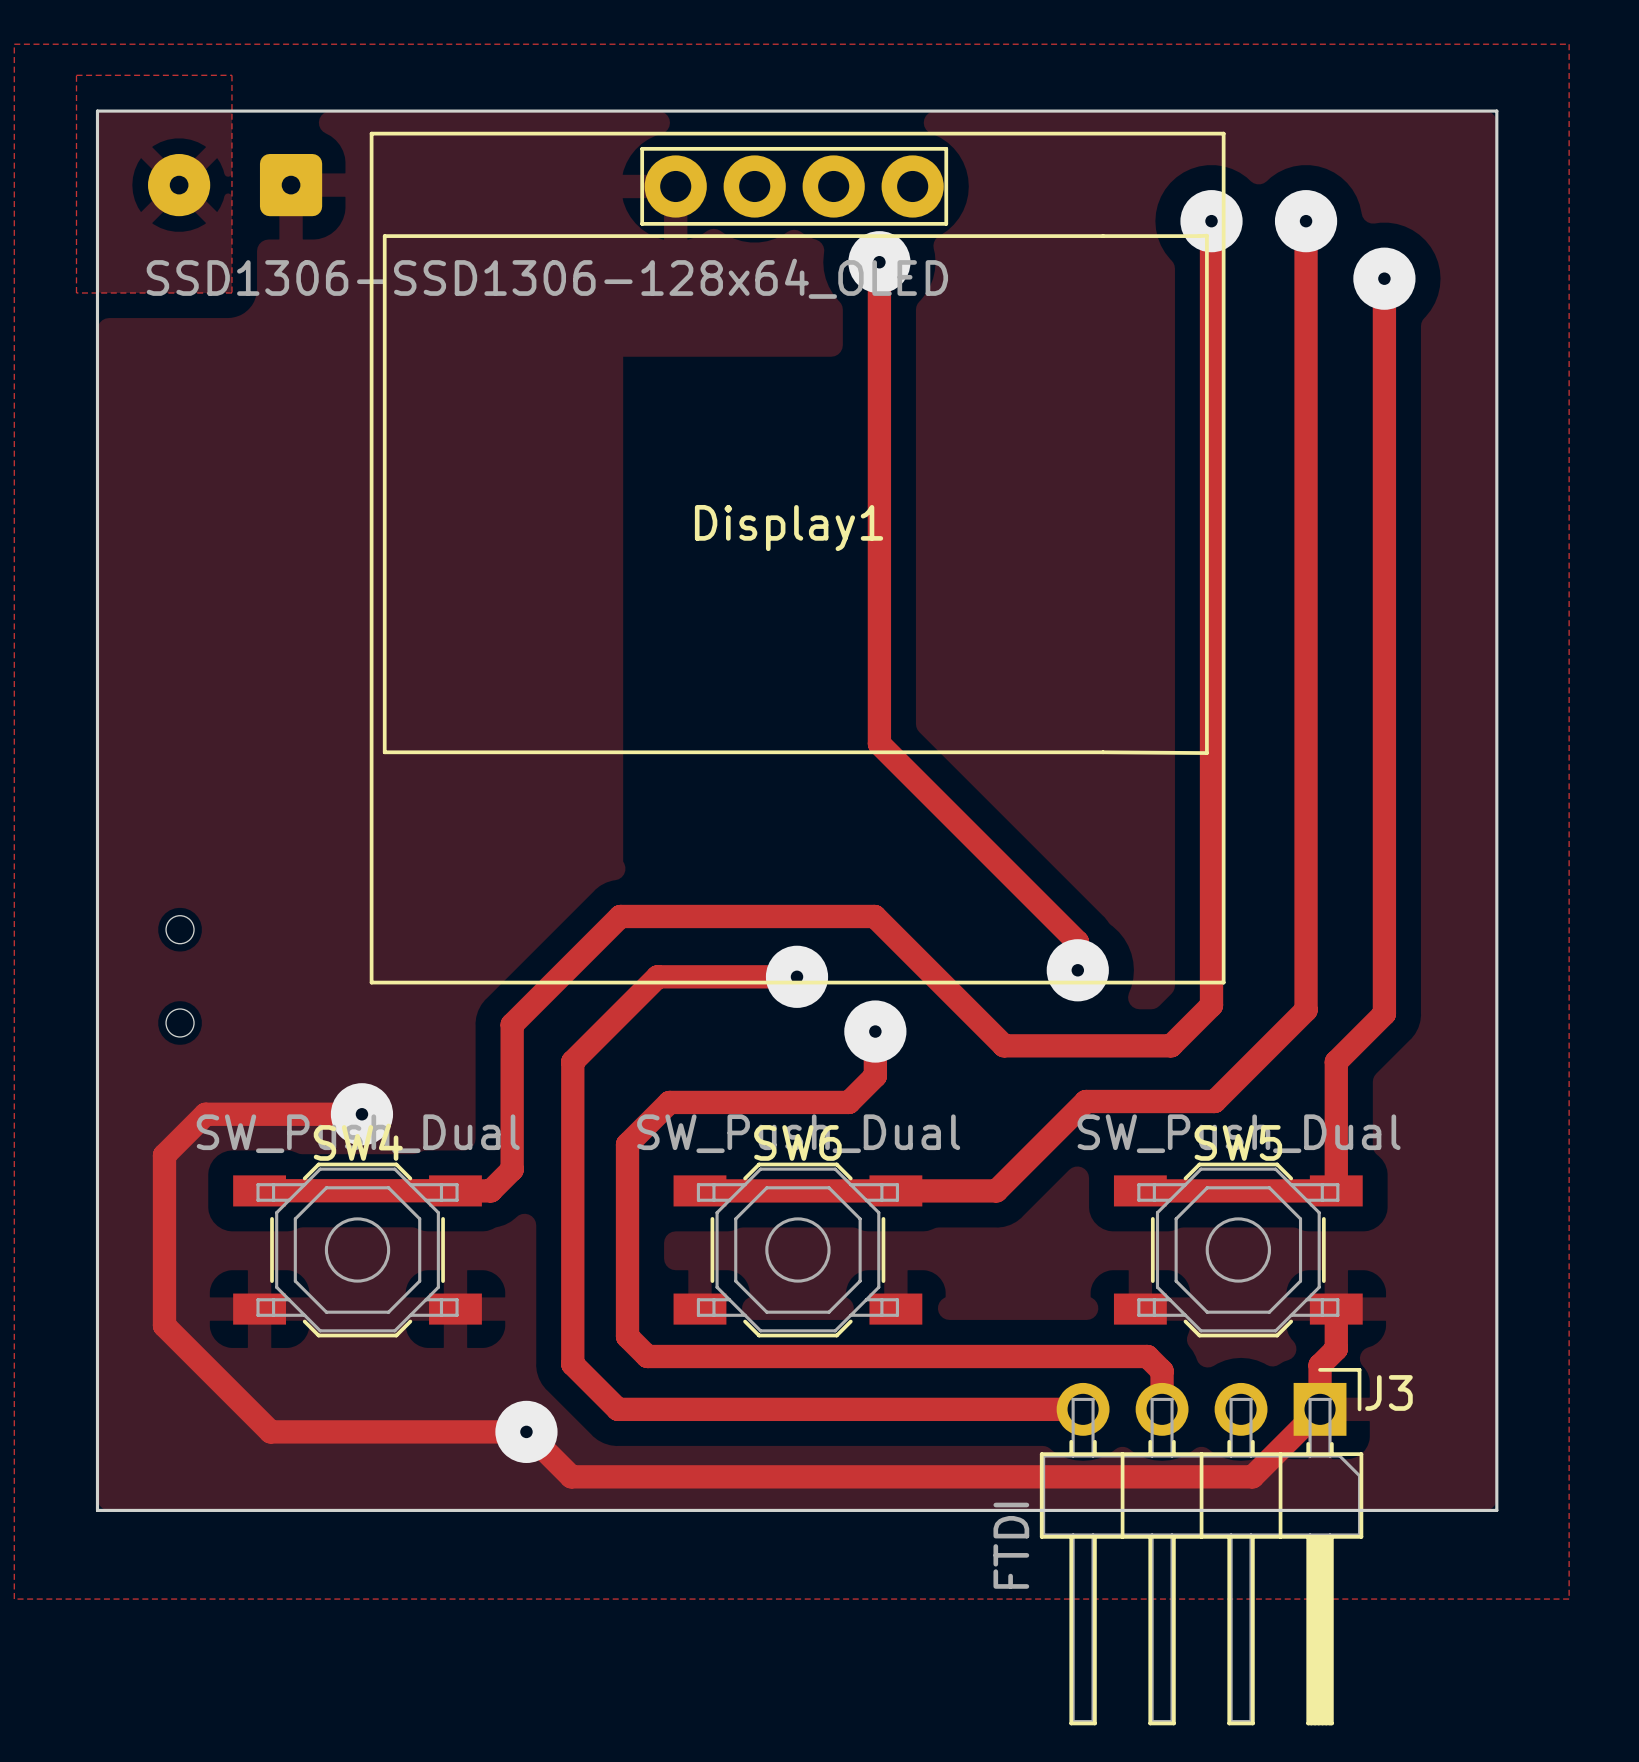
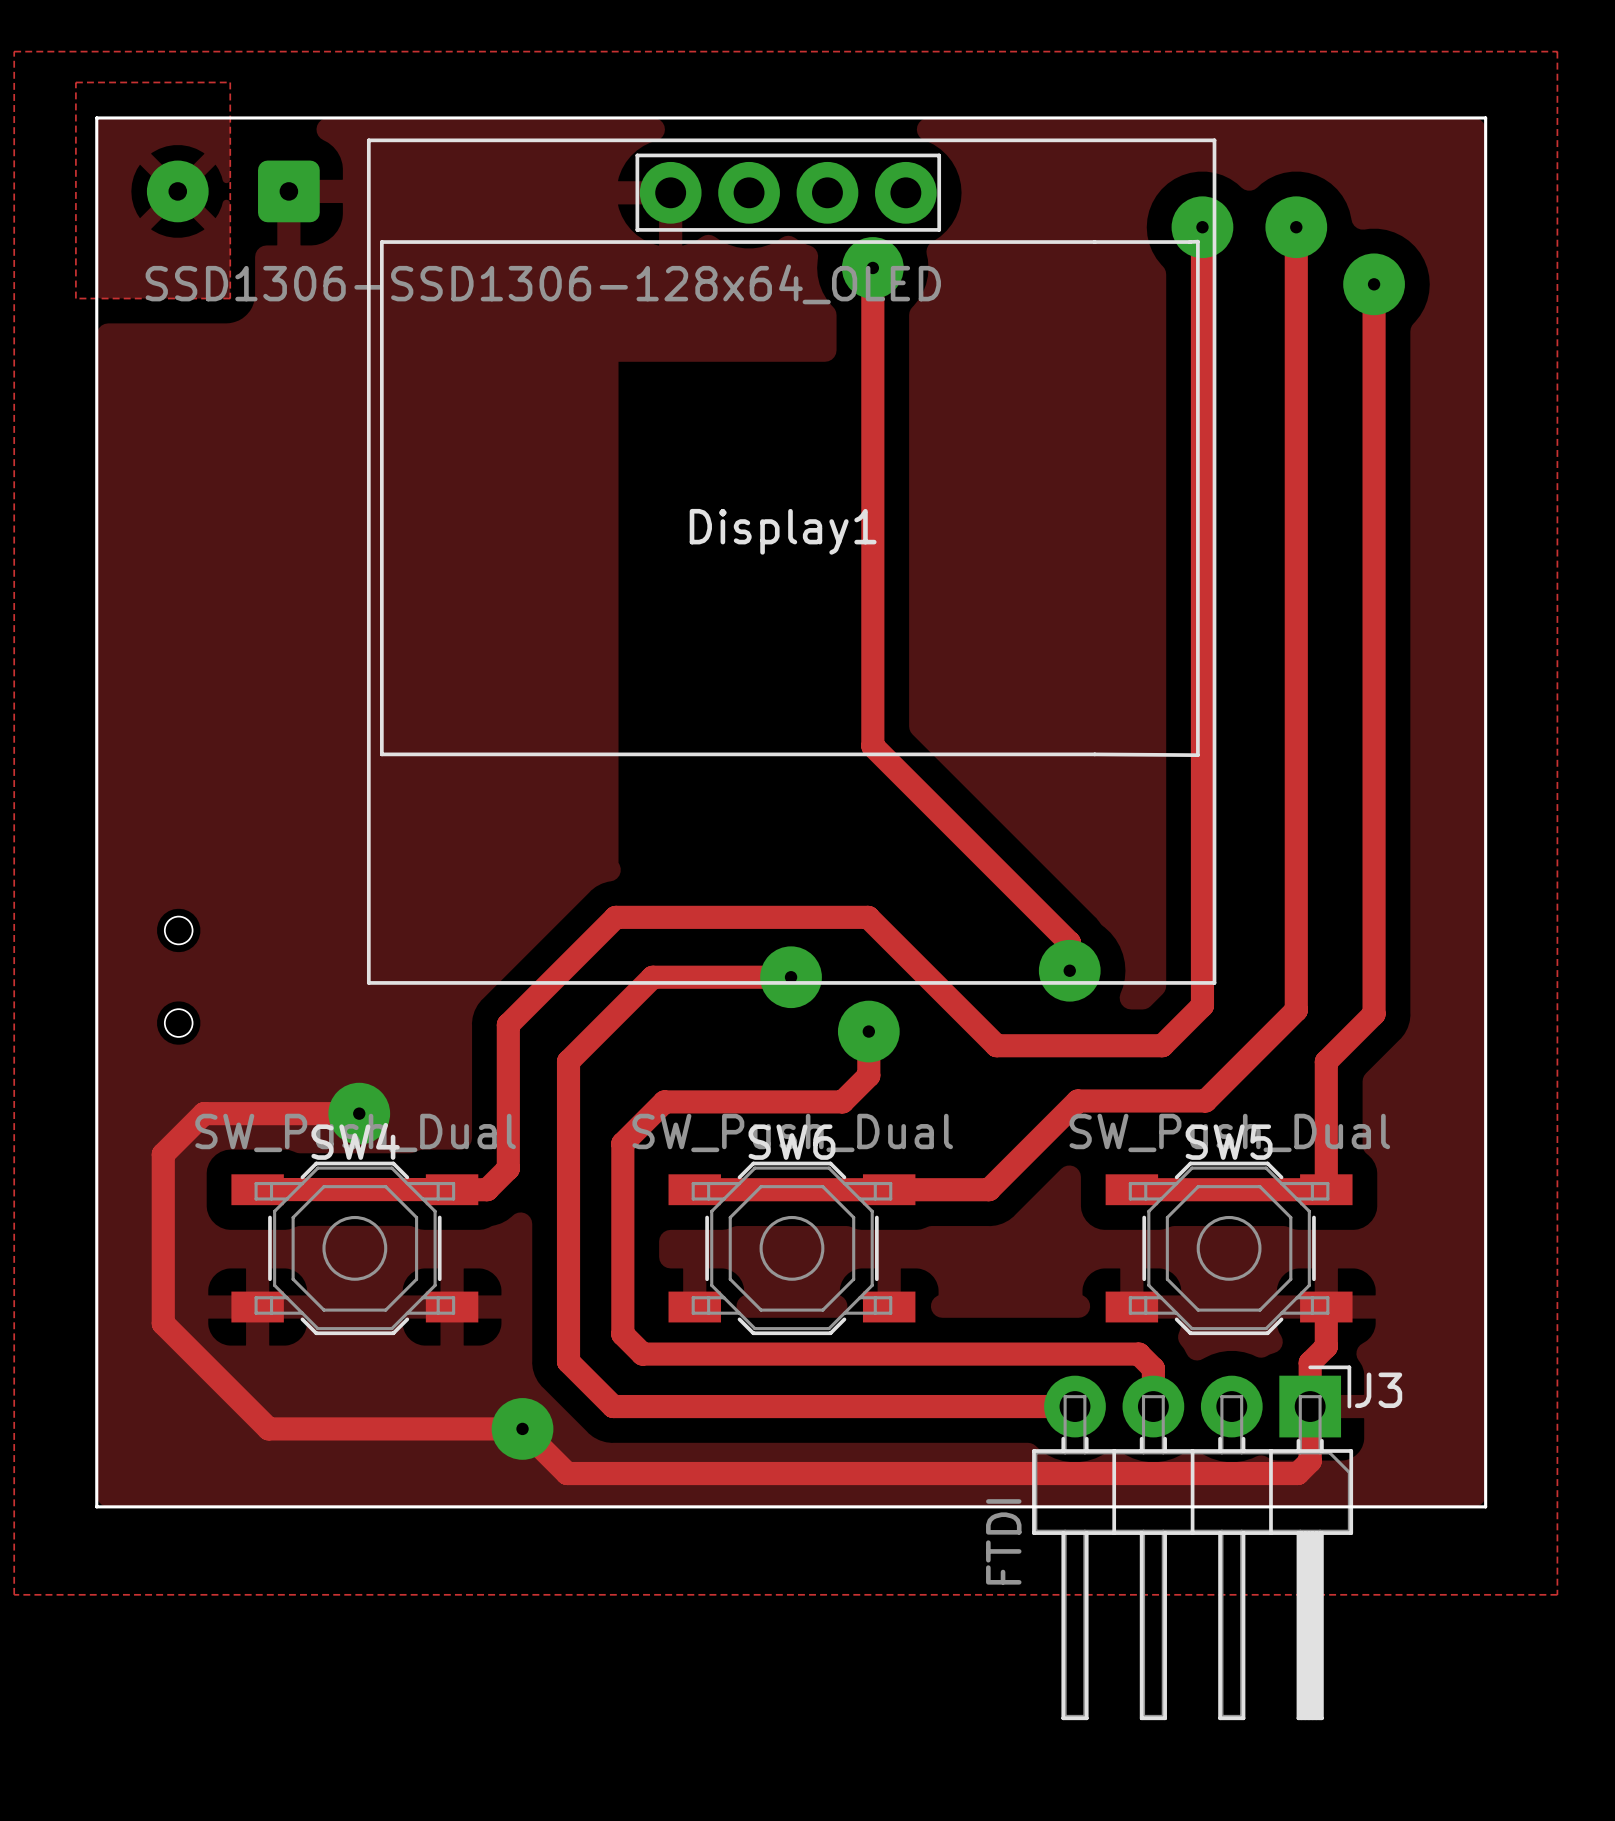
J3 footprint: [1039, 1368, 1364, 1726] -> [1032, 1365, 1354, 1721]
track: (1320, 1409) (1252, 1476) -> (1310, 1406) (1310, 1461) (1297, 1473) (1243, 1473)

